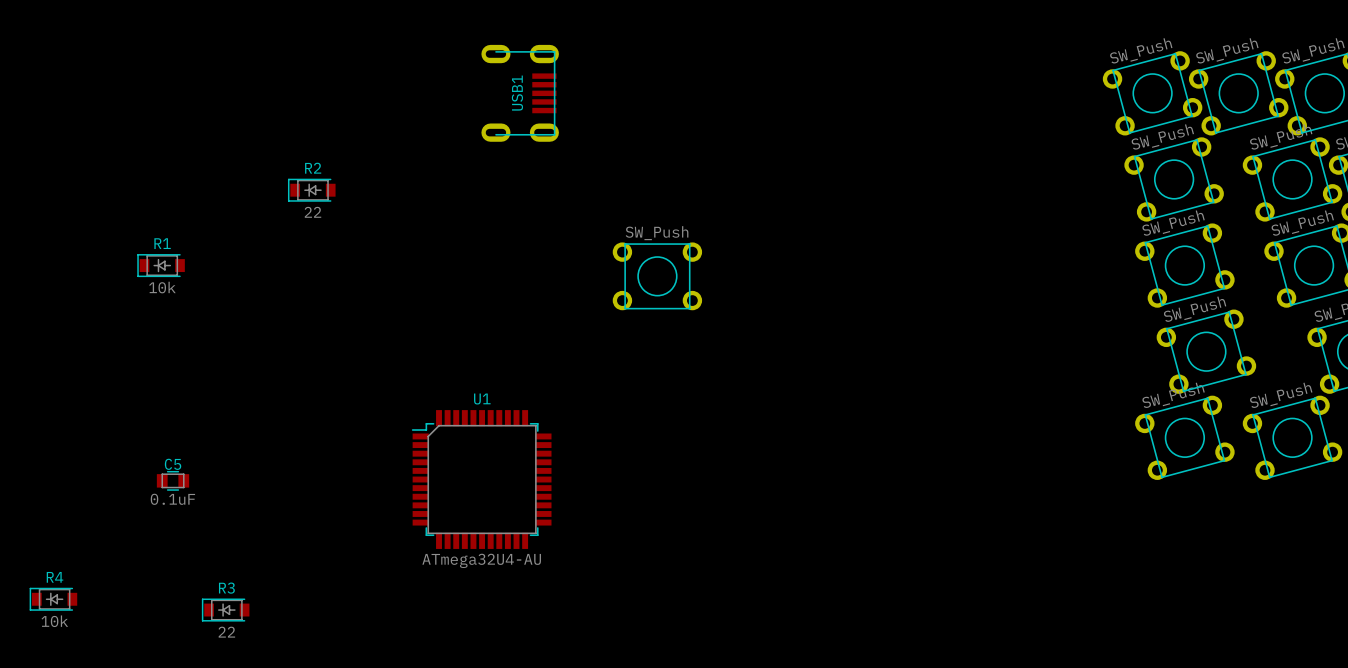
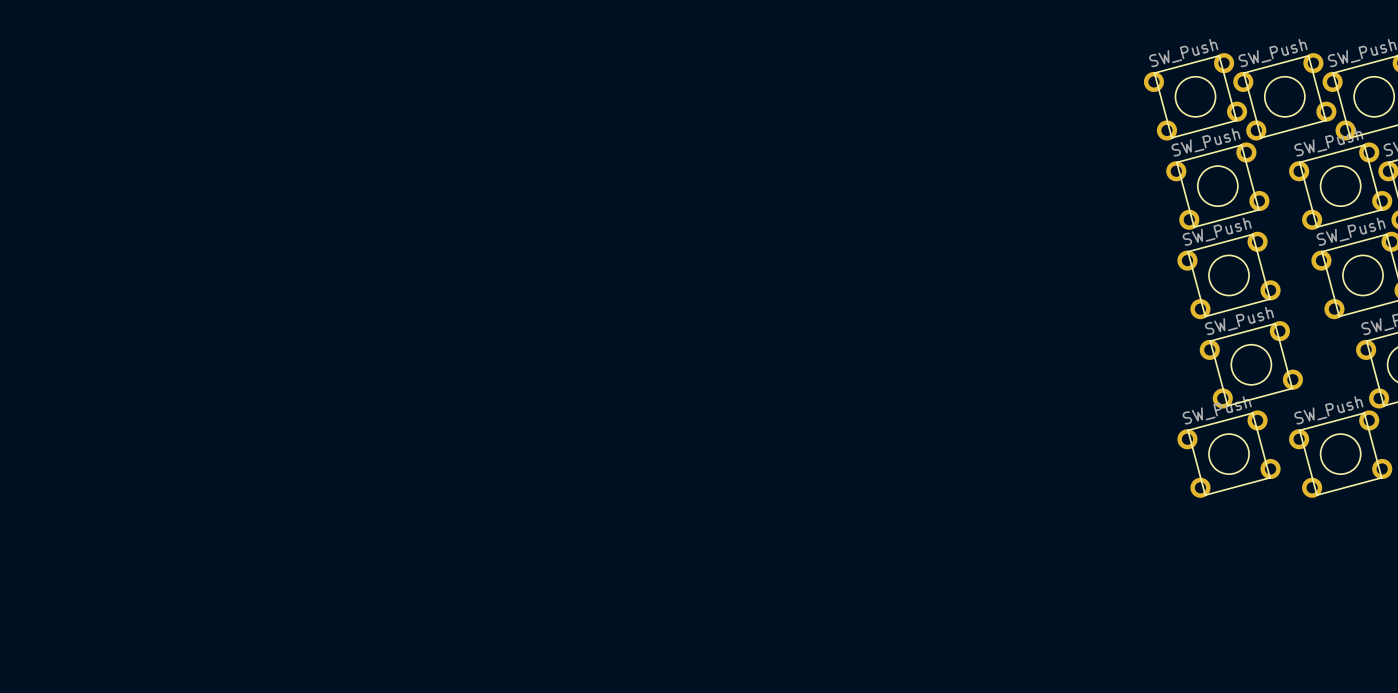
USB1: (520, 93) -> none
R2: 22 (311, 190) -> none
R1: 10k (161, 265) -> none
part: SW_Push (657, 276) -> none
U1: ATmega32U4-AU (481, 479) -> none
C5: 0.1uF (173, 480) -> none
R4: 10k (53, 599) -> none
R3: 22 (225, 610) -> none

